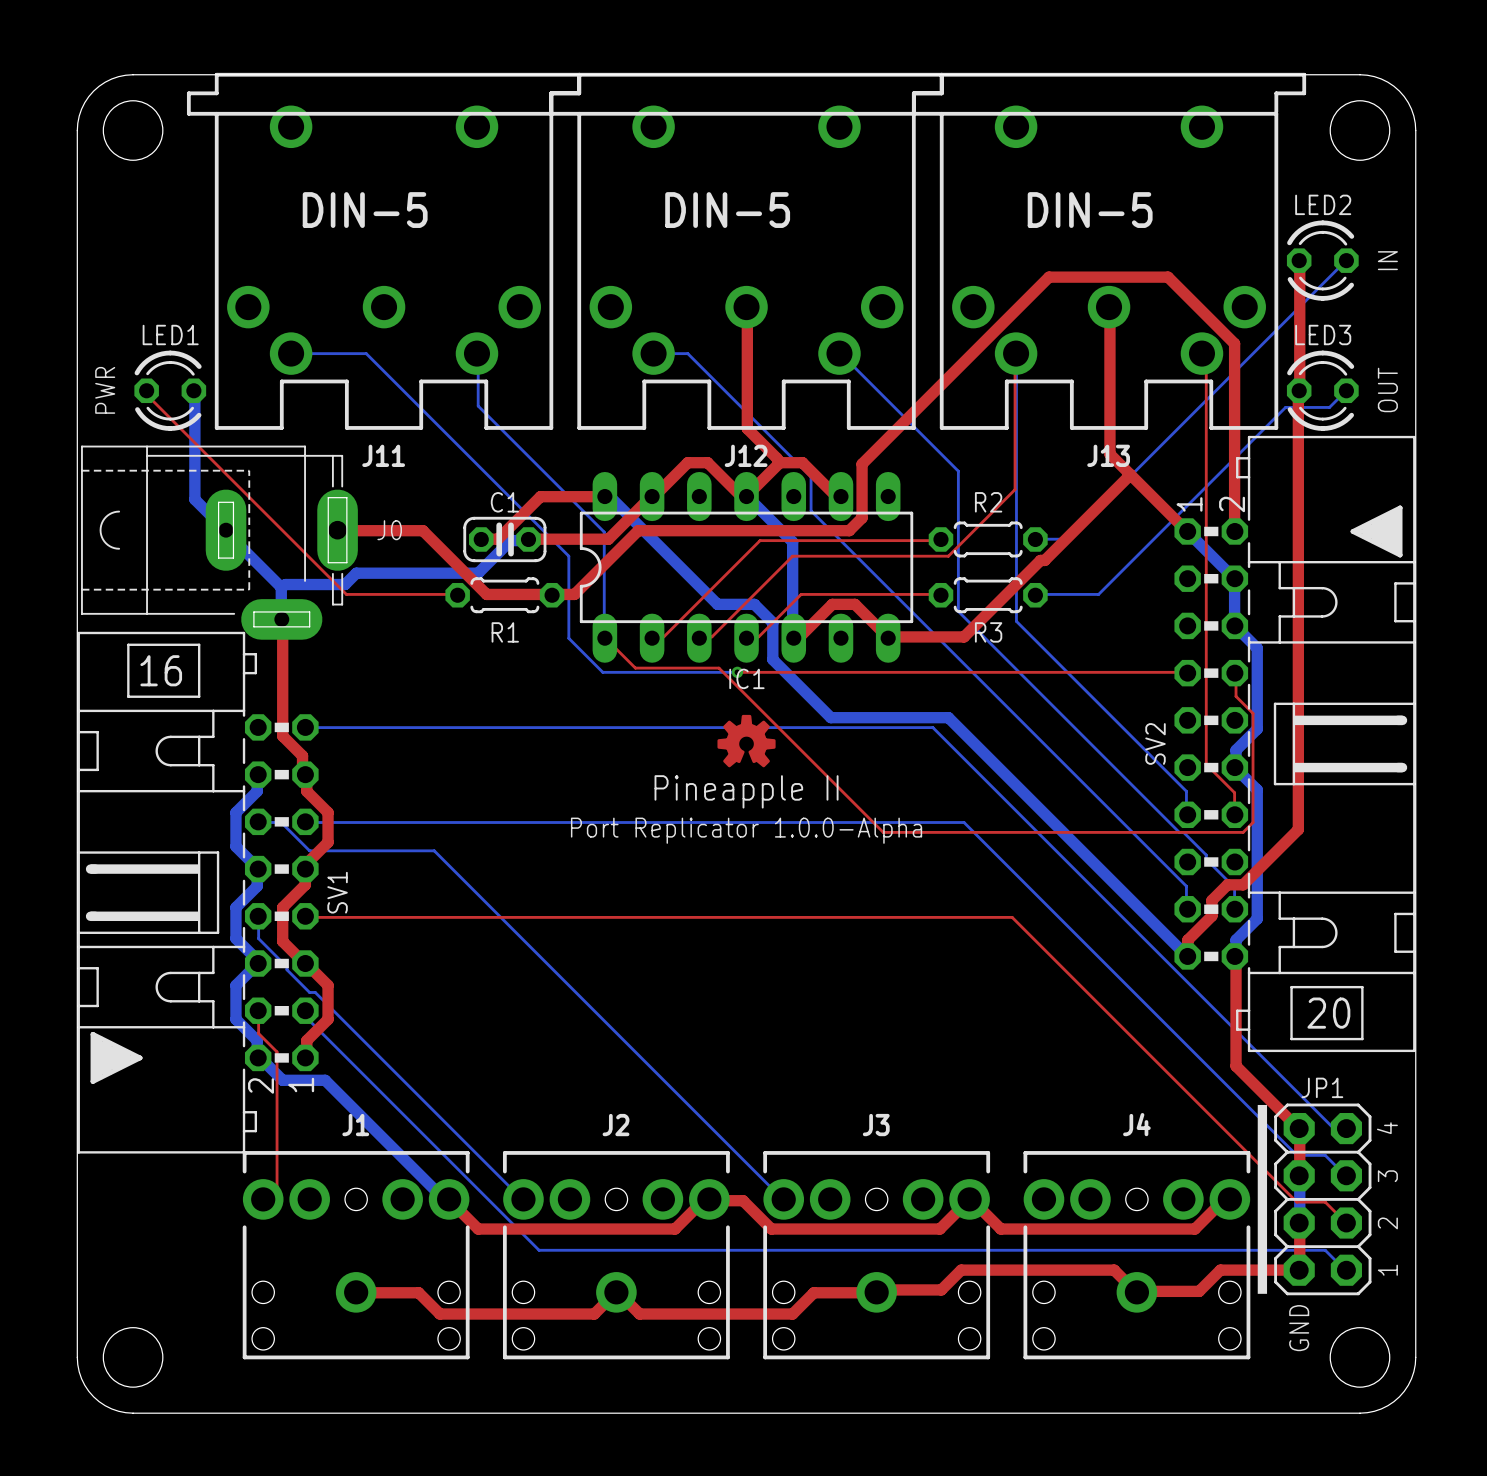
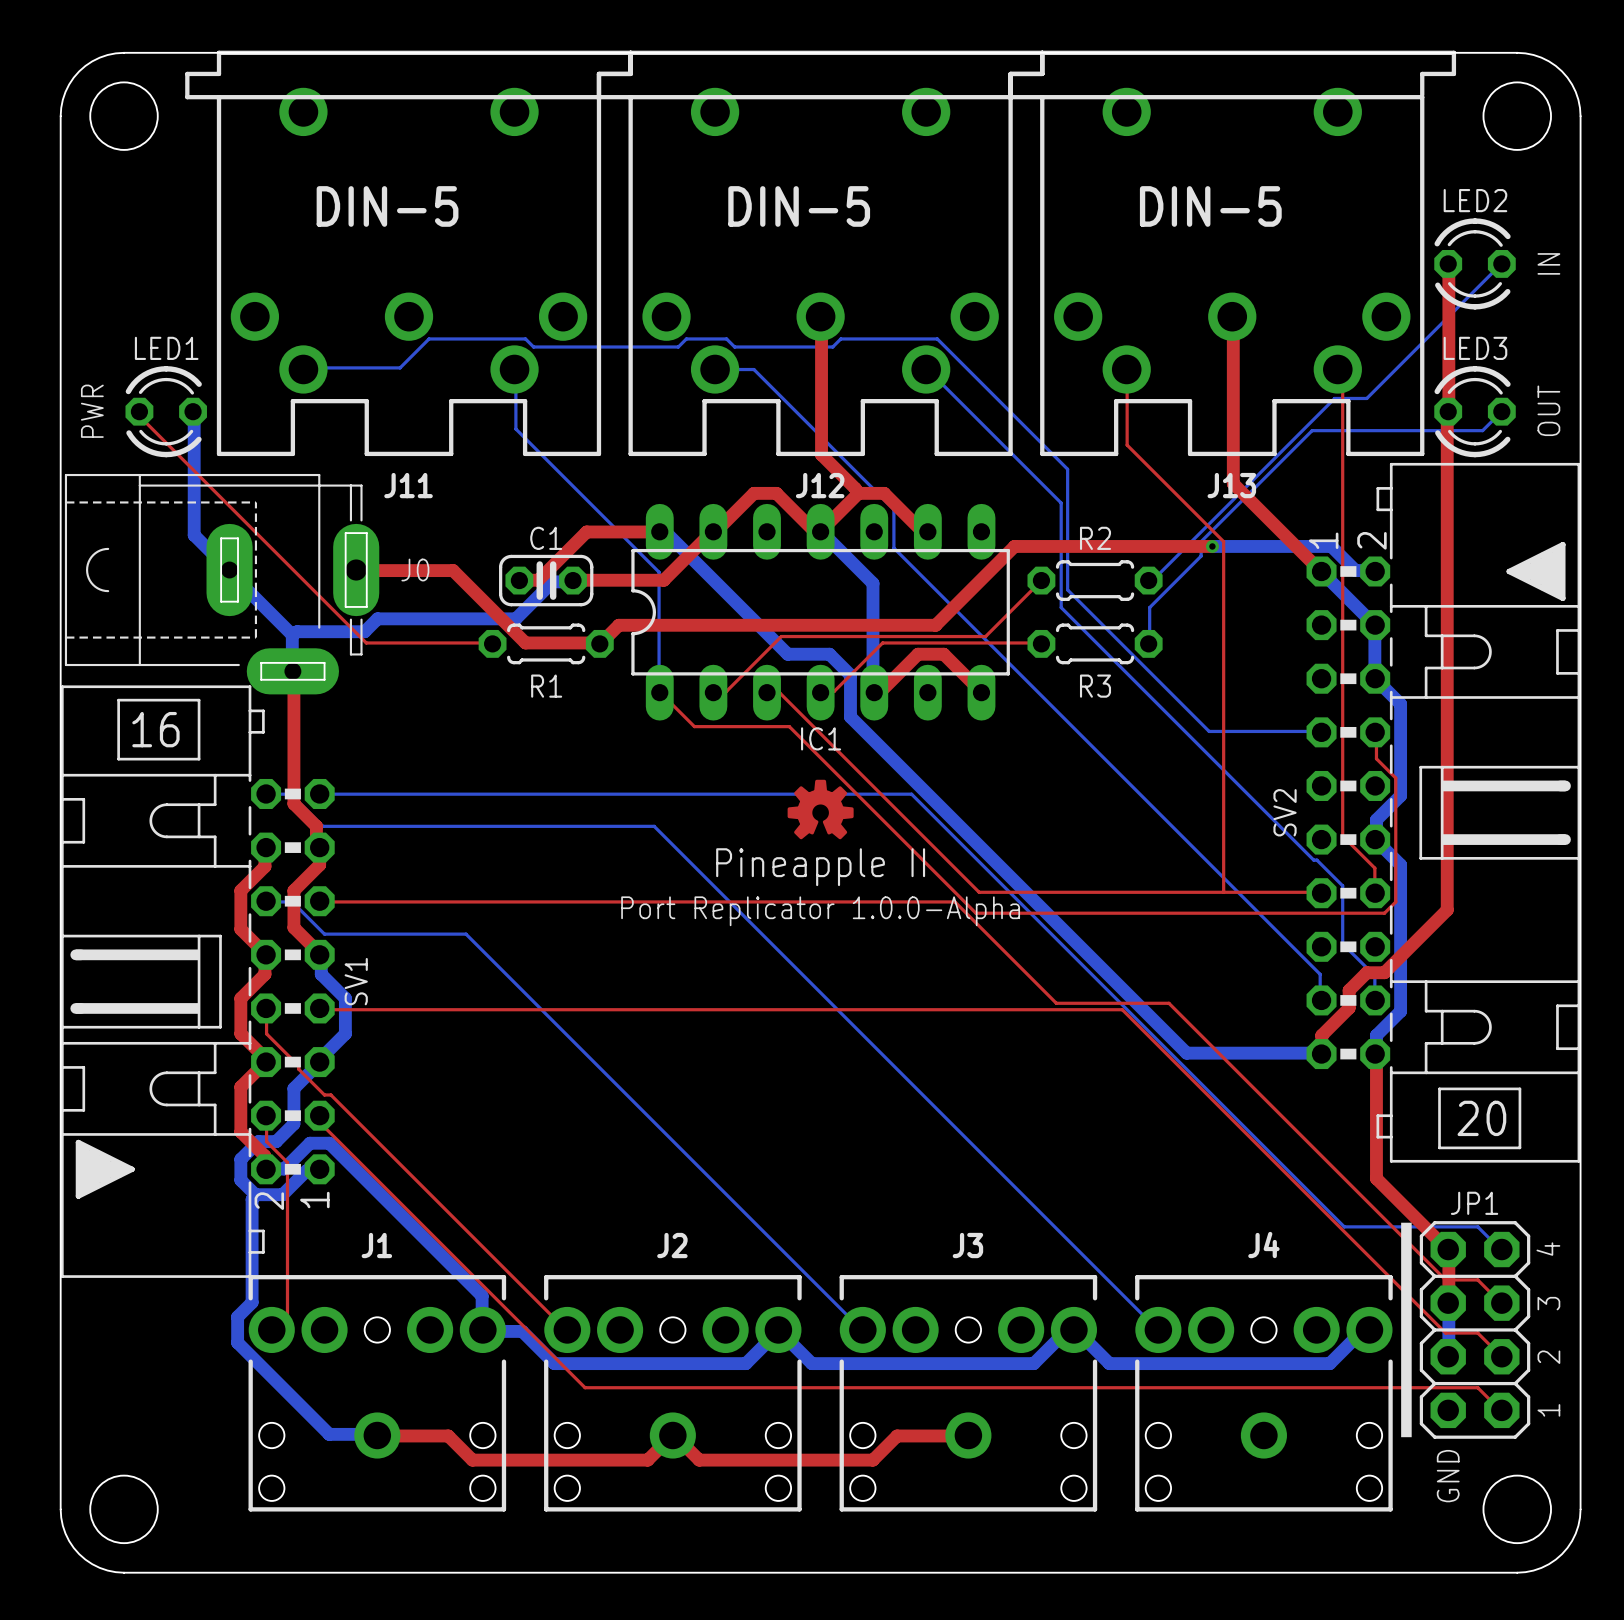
bottom track: (291, 353) (366, 353) (568, 556) (568, 638) (602, 672) (737, 672) -> (303, 369) (303, 367) (400, 367) (429, 338) (525, 338) (533, 347) (678, 347) (686, 338) (726, 338) (734, 347) (832, 347) (840, 338) (937, 338) (1067, 469) (1067, 589) (1209, 731) (1321, 732)
top track: (1016, 353) (1015, 489) (948, 556) (792, 556) (711, 636) (699, 638) -> (1126, 369) (1127, 445) (1223, 541) (1223, 892)
bottom track: (1016, 353) (1016, 621) -> (1061, 607) (1127, 673)
bottom track: (1227, 379) (1067, 539) (1039, 539) -> (1366, 398) (1334, 398) (1152, 580)
bottom track: (1285, 407) (1098, 594) (1036, 594) -> (1432, 430) (1312, 430) (1201, 541) (1201, 556) (1149, 607) (1149, 642)
top track: (1130, 474) (1044, 560) (1040, 560) (964, 636) (888, 638) -> none
bottom track: none -> (1212, 546) (1331, 546) (1355, 570) (1375, 571)
via: none -> (1212, 546)
top track: (1234, 531) (1234, 343) (1168, 277) (1049, 277) (862, 464) (862, 517) (849, 530) (638, 530) (574, 594) (552, 595) -> (1212, 546) (1014, 546) (935, 625) (618, 625) (599, 643)
top track: (939, 540) (760, 540) (711, 588) -> (1040, 581) (985, 636) (781, 636)
bottom track: (958, 563) (958, 611) (1179, 832) (1183, 832) (1206, 855) -> none
top track: none -> (767, 692) (779, 692) (979, 892) (1321, 893)
top track: (737, 672) (1187, 673) -> none
via: (737, 672) -> none
bottom track: (830, 717) (948, 717) (1186, 955) -> (916, 782) (1186, 1053) (1320, 1053)
bottom track: none -> (266, 793) (290, 794) (322, 826) (654, 826) (1158, 1329)
bottom track: (826, 727) (932, 727) (1333, 1128) (1345, 1128) -> (911, 794) (1344, 1226) (1477, 1226) (1500, 1249)
top track: none -> (266, 847) (264, 866) (240, 890) (240, 929) (266, 954) (264, 974) (240, 998) (240, 1033) (263, 1056) (266, 1062) (240, 1086) (240, 1131) (264, 1156) (266, 1169)
bottom track: (258, 774) (257, 791) (235, 812) (235, 846) (258, 869) (257, 886) (235, 907) (235, 938) (255, 958) (258, 963) (235, 985) (235, 1019) (257, 1040) (257, 1057) (262, 1060) (282, 1080) (325, 1080) (444, 1199) (449, 1199) -> none
top track: (305, 774) (306, 791) (328, 812) (328, 842) (306, 863) (305, 869) -> (319, 847) (319, 864) (293, 890) (293, 927) (319, 954)
bottom track: (1180, 785) (1186, 791) (1187, 814) -> (1313, 860) (1316, 860) (1342, 885) (1342, 938)
top track: none -> (319, 901) (955, 901) (1056, 1003) (1168, 1003) (1445, 1279) (1477, 1279) (1501, 1303)
bottom track: (305, 821) (964, 822) (1296, 1155) (1325, 1155) (1346, 1175) -> none
top track: (305, 869) (305, 884) (282, 907) (282, 941) (328, 985) (328, 1019) (306, 1040) (305, 1057) -> none
bottom track: none -> (319, 954) (321, 955) (321, 974) (345, 998) (345, 1033) (293, 1088) (293, 1123) (276, 1141) (258, 1141) (240, 1159) (240, 1180) (255, 1194)
top track: none -> (266, 1008) (266, 1033) (298, 1066) (298, 1069) (324, 1094) (330, 1094) (567, 1329)
bottom track: (258, 916) (258, 938) (286, 966) (286, 969) (309, 992) (315, 992) (523, 1199) -> none
top track: none -> (319, 1115) (321, 1115) (321, 1123) (585, 1387) (1477, 1387) (1501, 1410)
bottom track: (305, 1010) (306, 1017) (539, 1250) (1325, 1250) (1346, 1270) -> none
bottom track: none -> (266, 1169) (284, 1168) (310, 1143) (329, 1143) (482, 1296) (483, 1331) (522, 1331) (554, 1363) (745, 1363) (778, 1329) (811, 1363) (1033, 1363) (1066, 1331) (1073, 1329) (1109, 1363) (1329, 1363) (1361, 1331) (1369, 1329)
bottom track: none -> (319, 1169) (306, 1170) (282, 1194) (255, 1194)
bottom track: none -> (255, 1194) (252, 1199) (252, 1302) (237, 1316) (237, 1342) (329, 1434) (377, 1435)
top track: (449, 1199) (478, 1229) (675, 1229) (702, 1202) (709, 1199) (743, 1200) (771, 1229) (939, 1229) (969, 1199) (1000, 1229) (1194, 1229) (1223, 1200) (1229, 1199) -> none
top track: (1299, 1223) (1299, 1270) (1220, 1270) (1199, 1291) (1136, 1292) (1114, 1270) (961, 1270) (941, 1289) (881, 1289) (876, 1292) -> none

